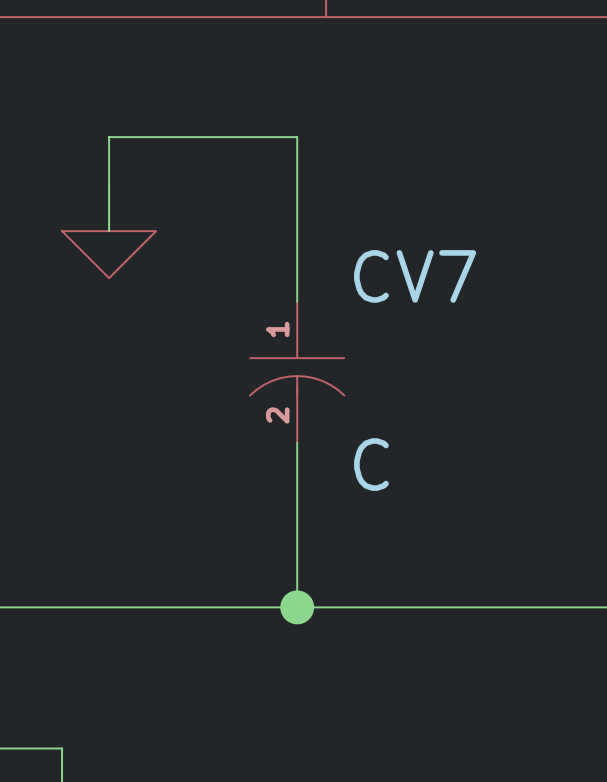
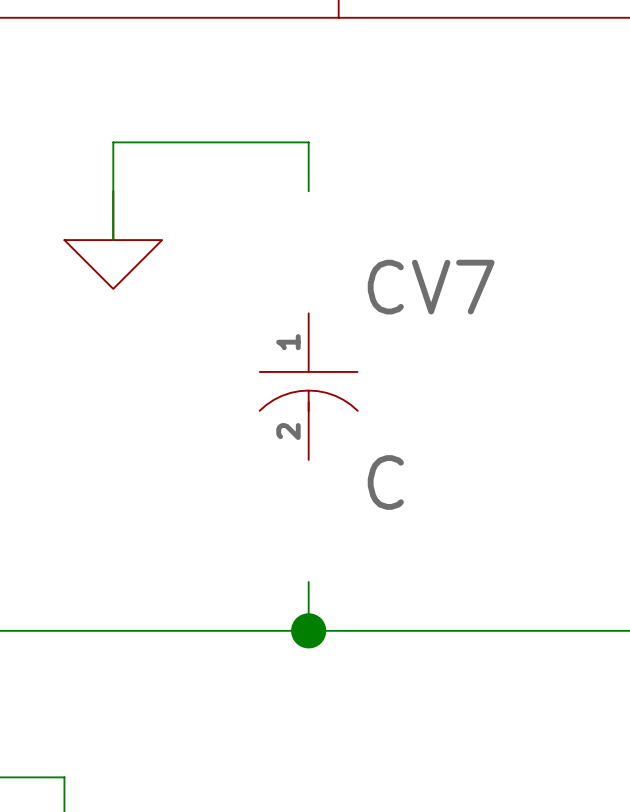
wire: (297, 184) (297, 301) -> none
wire: (297, 442) (297, 560) -> none

